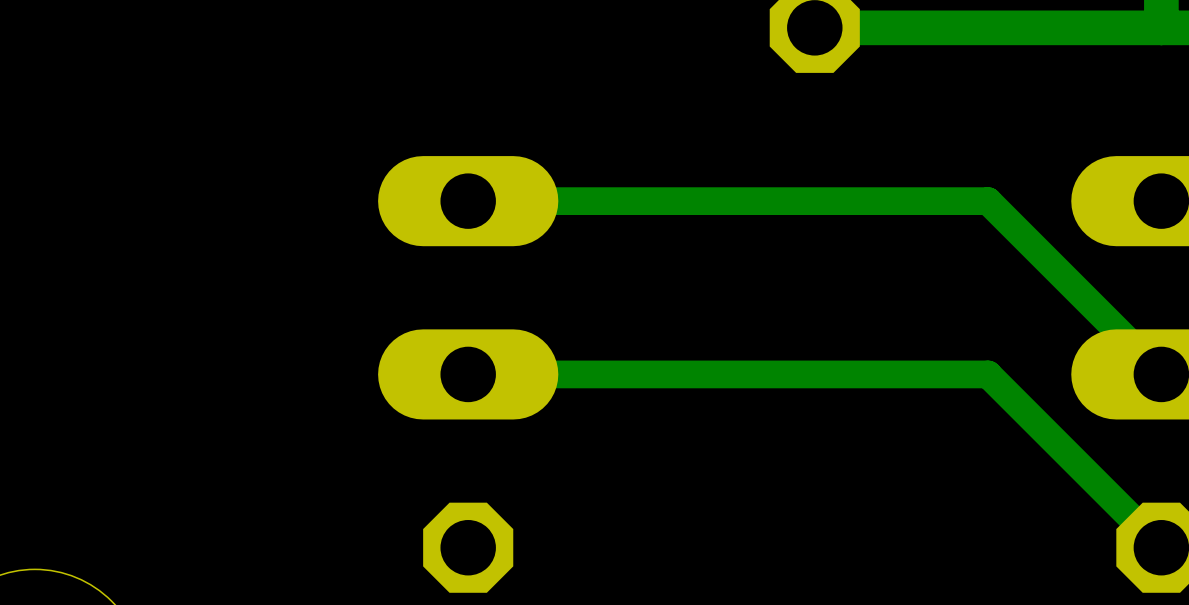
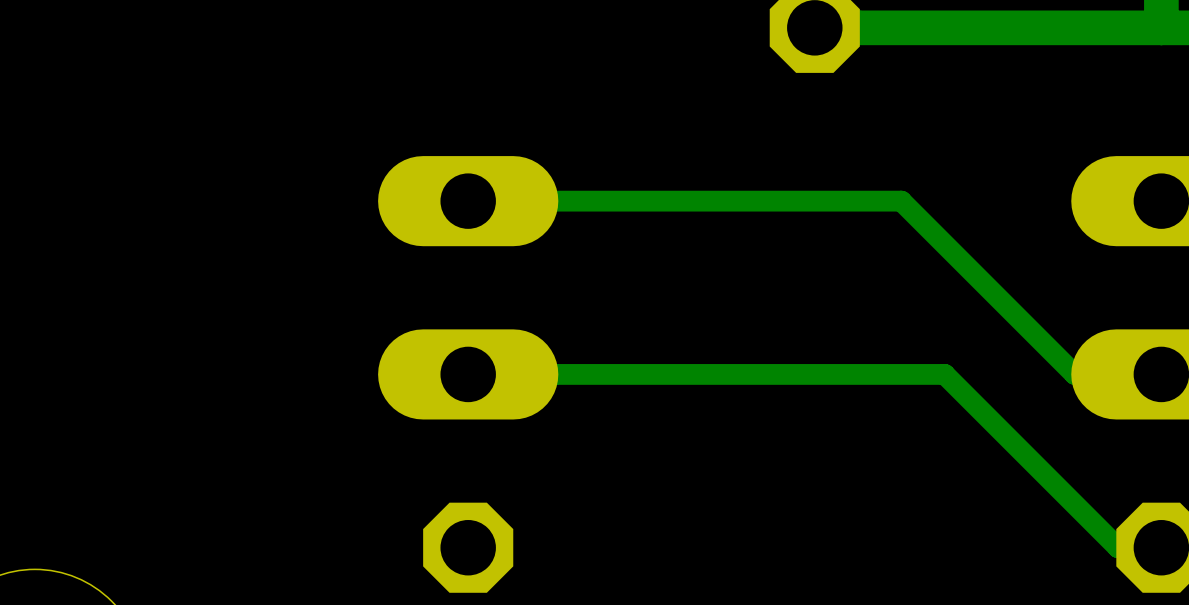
track: (901, 201) (988, 201) (1161, 374) -> (901, 201) (1074, 374) (1161, 374)
track width: thick (901, 201) (468, 201) -> thin (901, 201) (468, 201)
track: (944, 374) (988, 374) (1161, 547) -> (944, 374) (1118, 547) (1161, 547)
track width: thick (944, 374) (468, 374) -> thin (944, 374) (468, 374)

